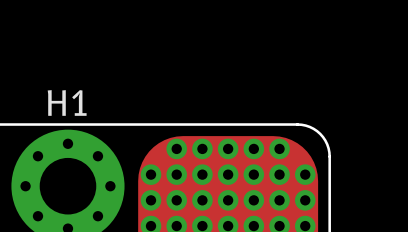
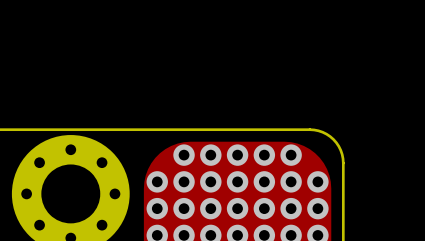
H1 name: H1 (67, 102) -> none

